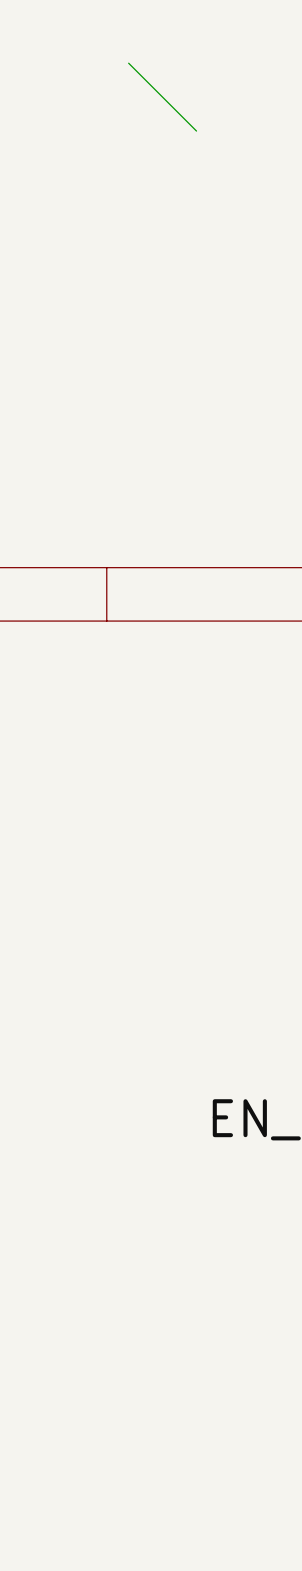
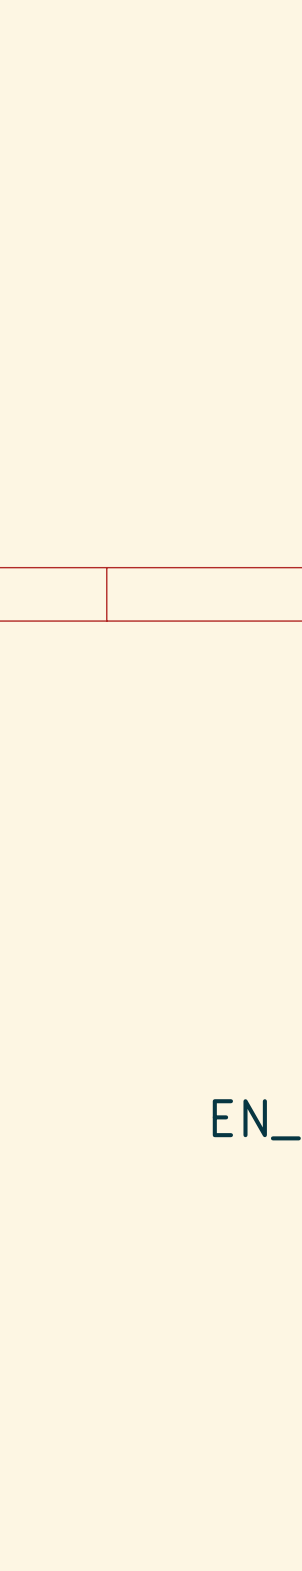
wire: (128, 63) (196, 131) -> none

